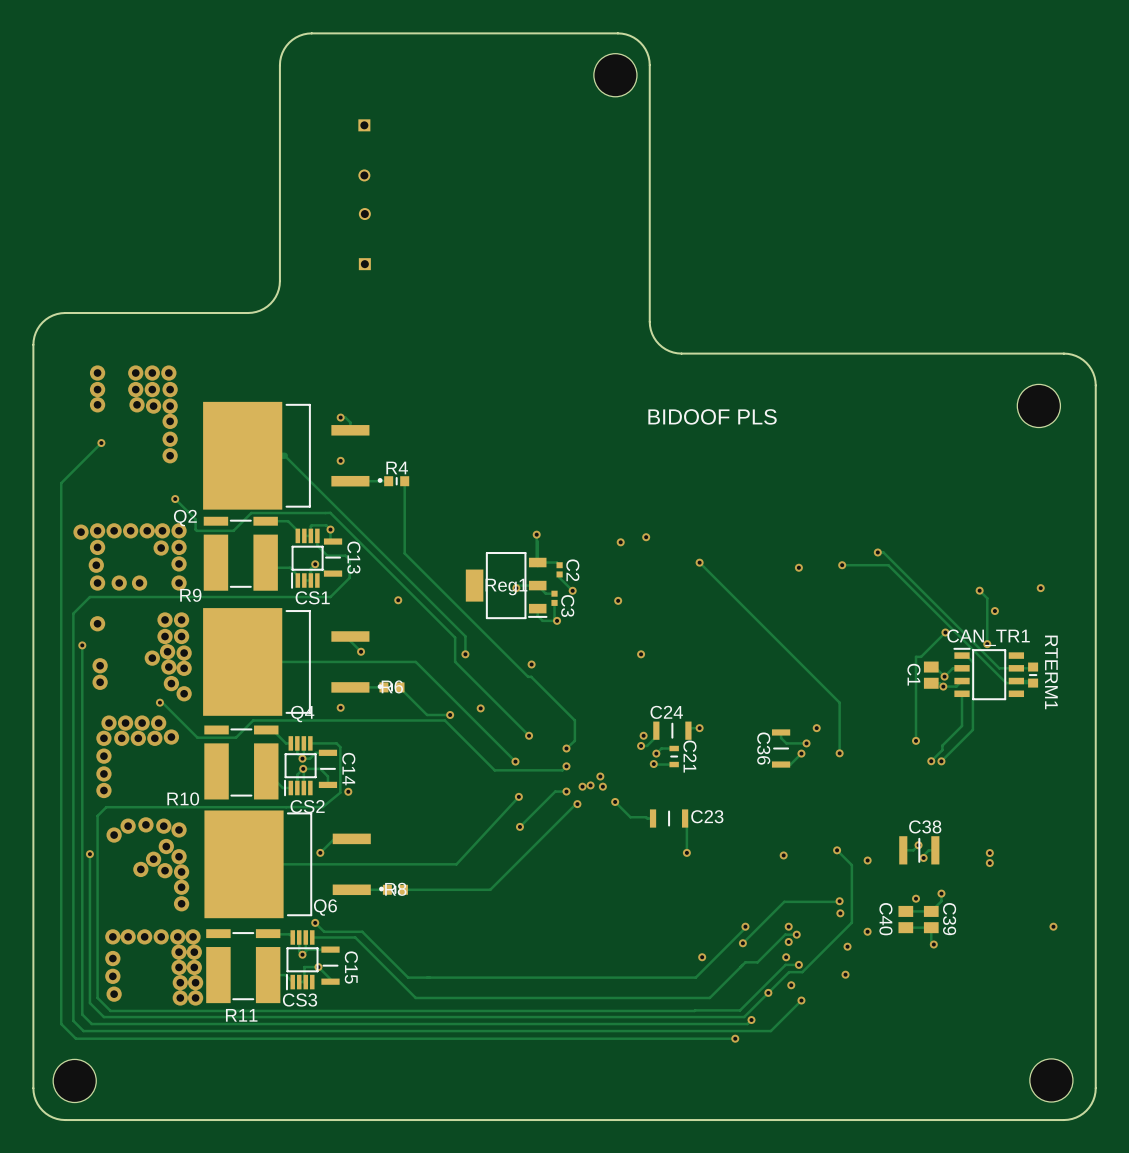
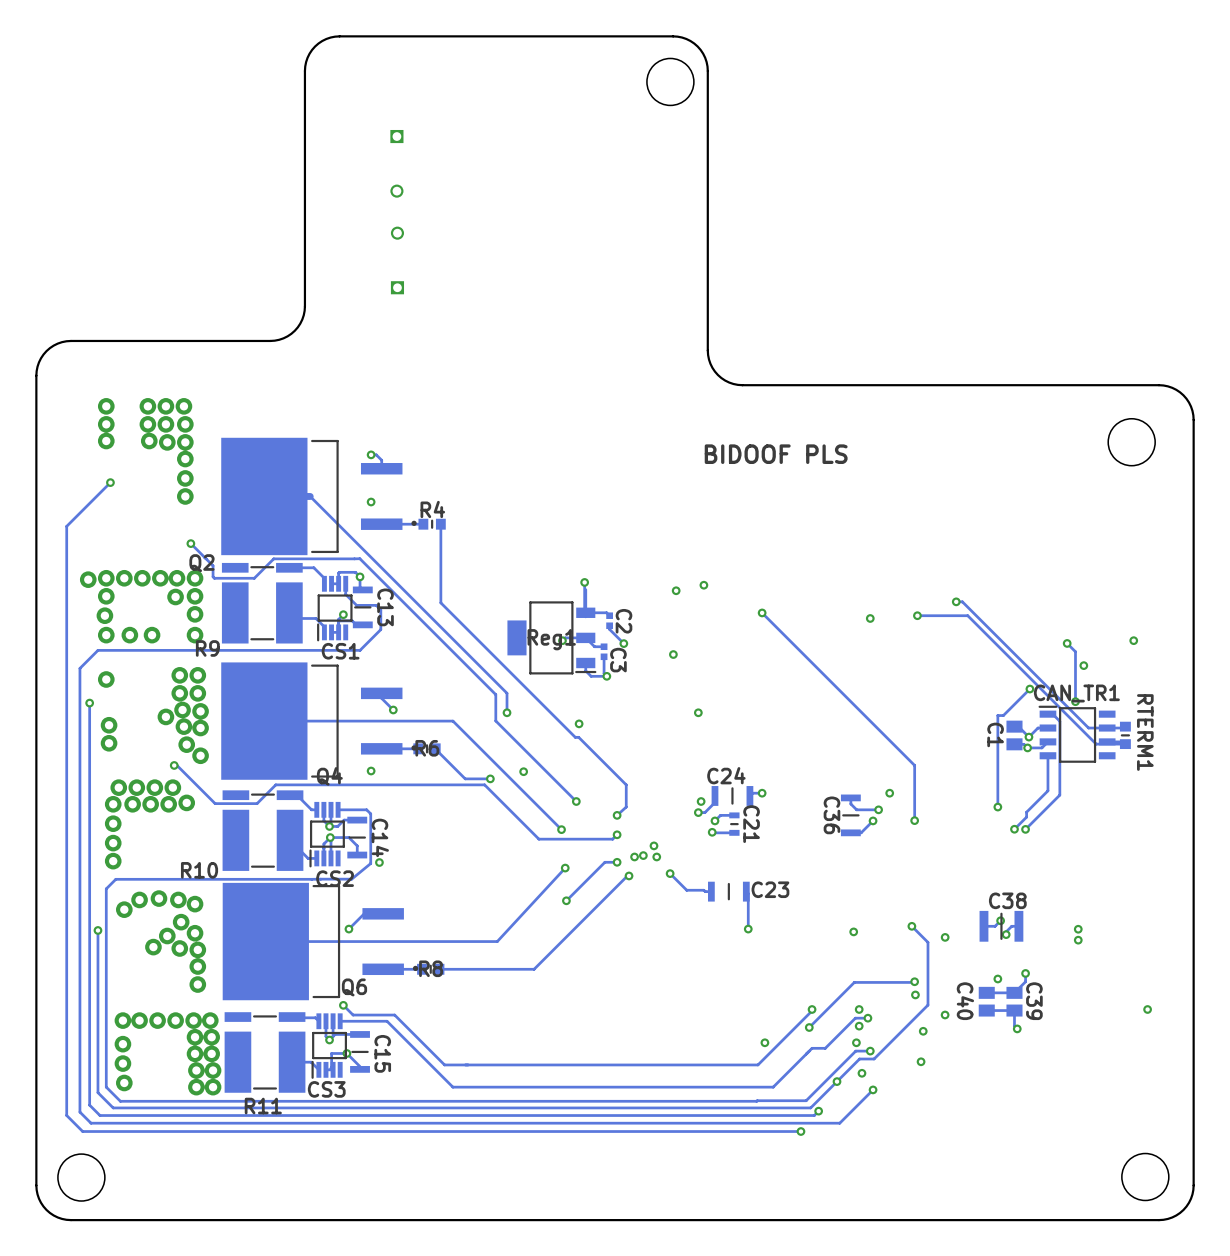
via: (398, 600) -> none

